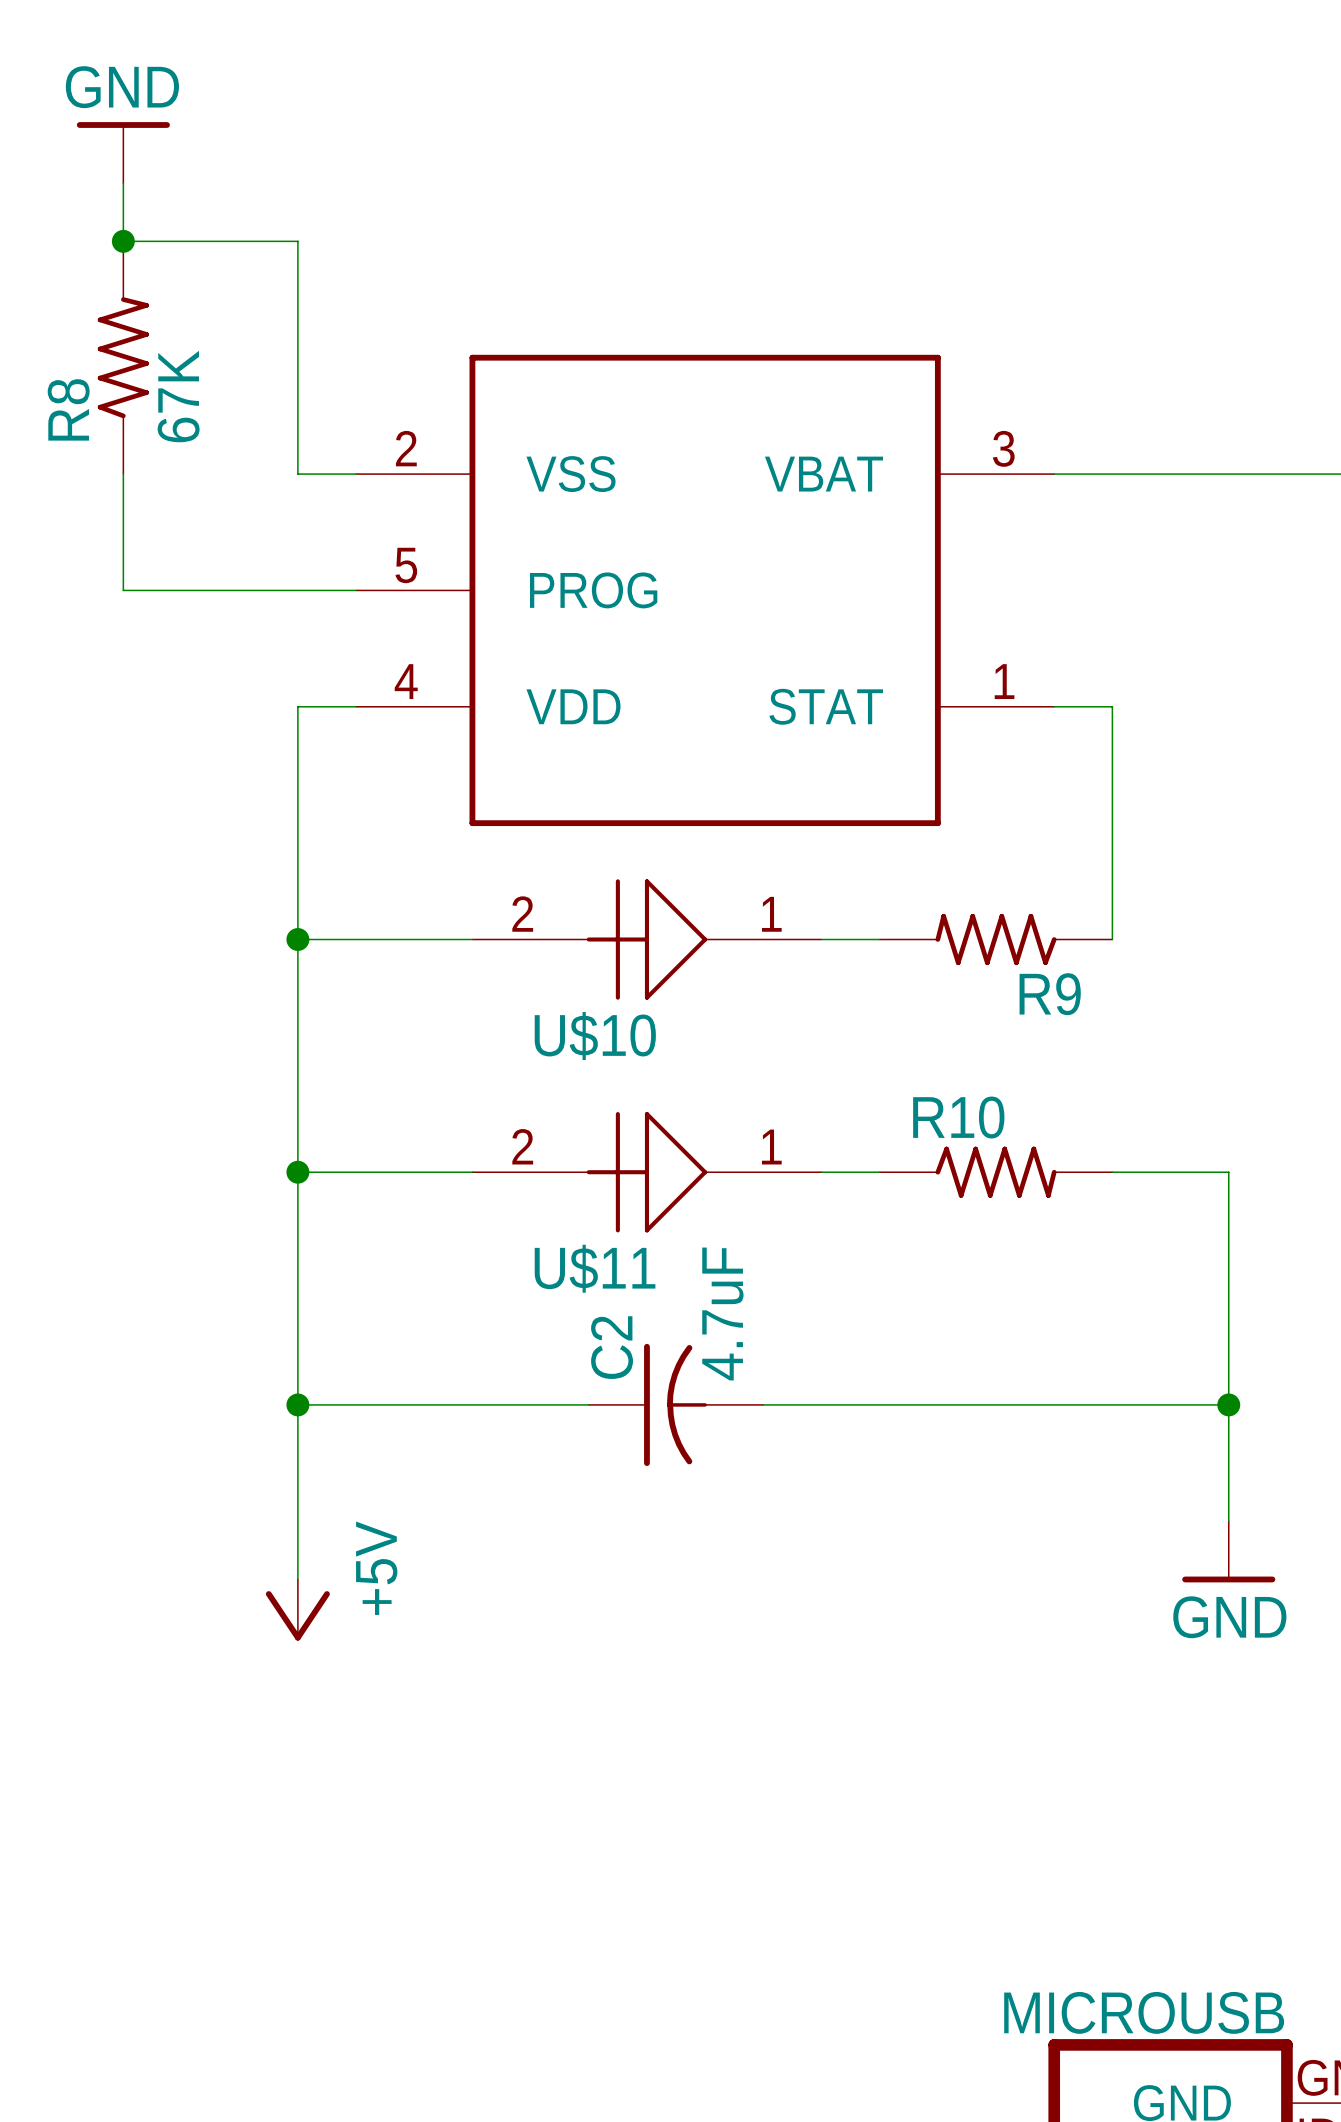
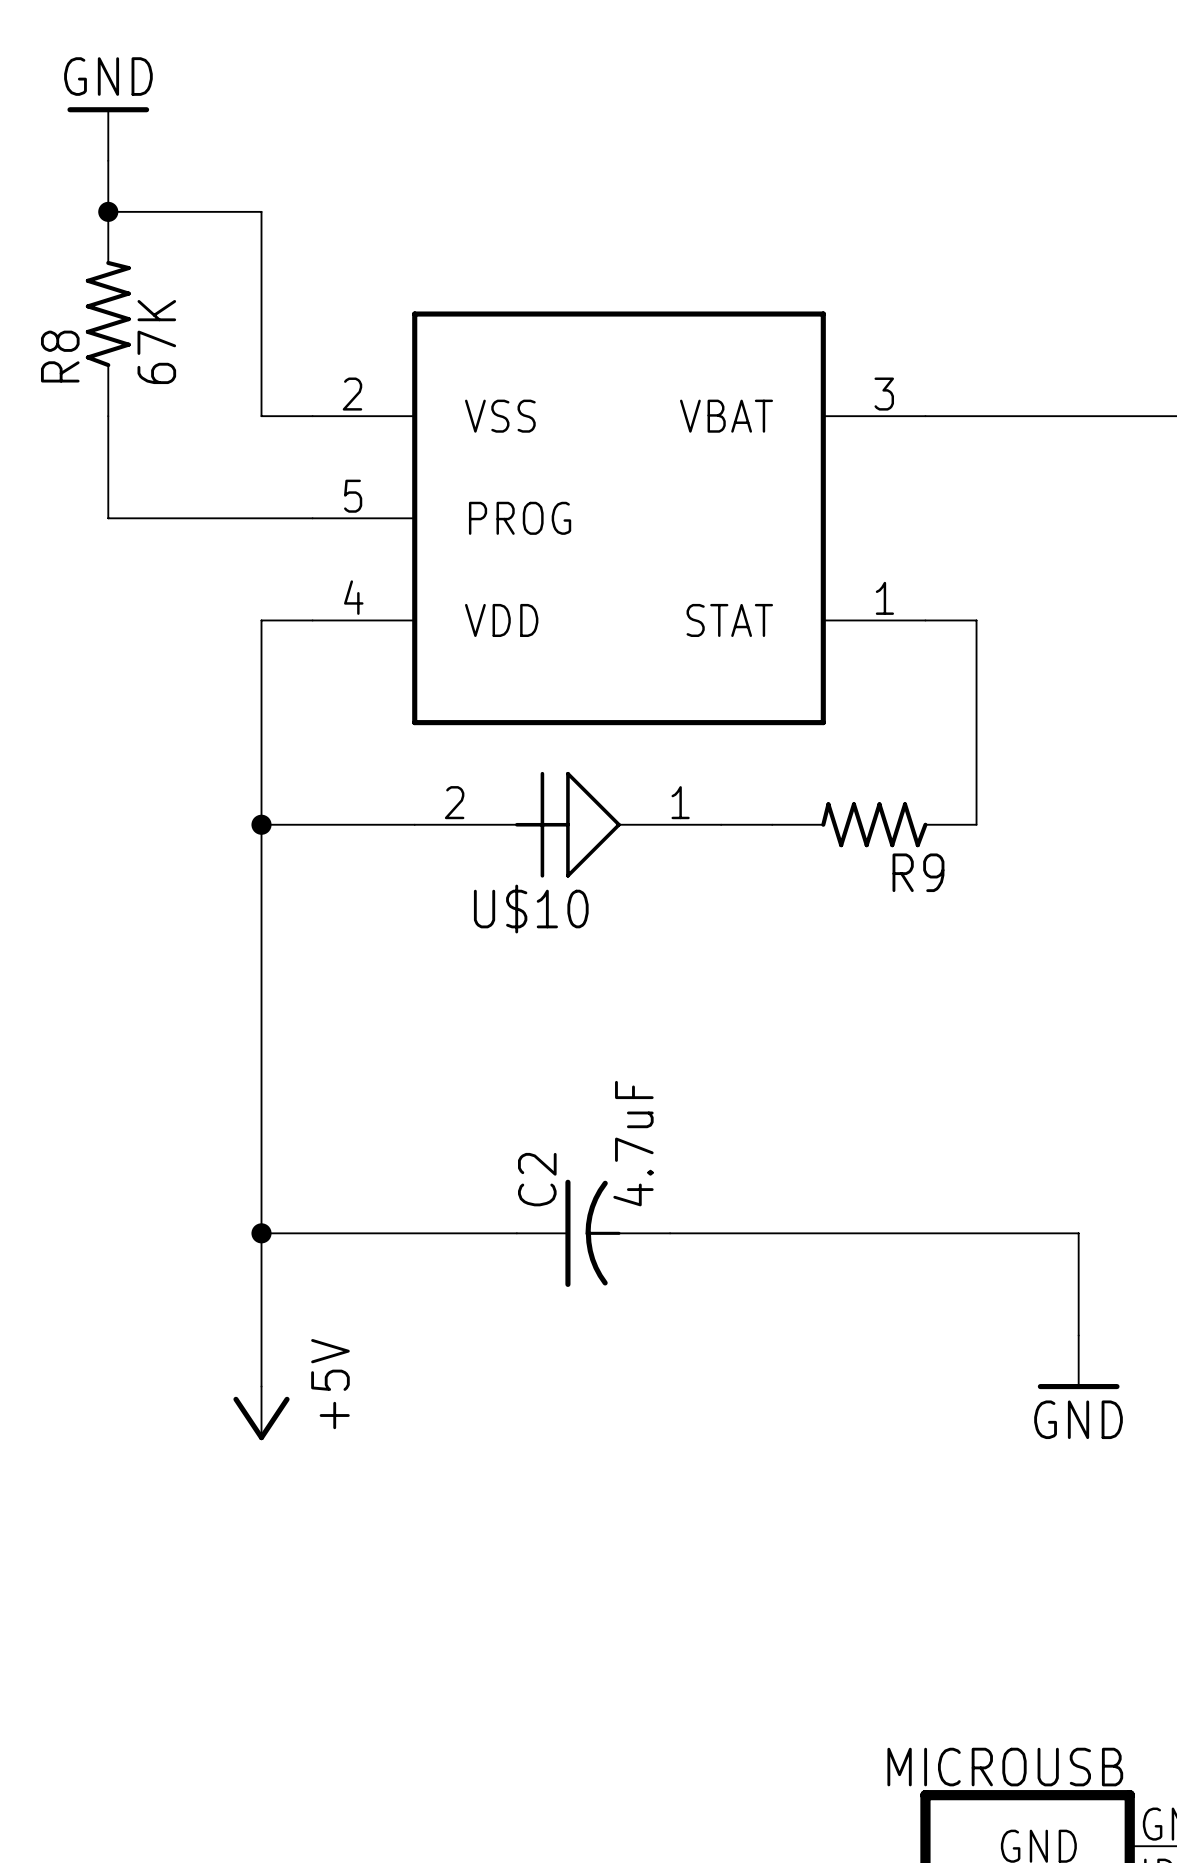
wire: (297, 1172) (472, 1172) -> none
junction: (297, 1172) -> none
U$11: (646, 1172) -> none
wire: (821, 1172) (879, 1172) -> none
R10: (996, 1172) -> none
wire: (1112, 1172) (1228, 1172) (1228, 1404) -> none
junction: (1228, 1404) -> none

